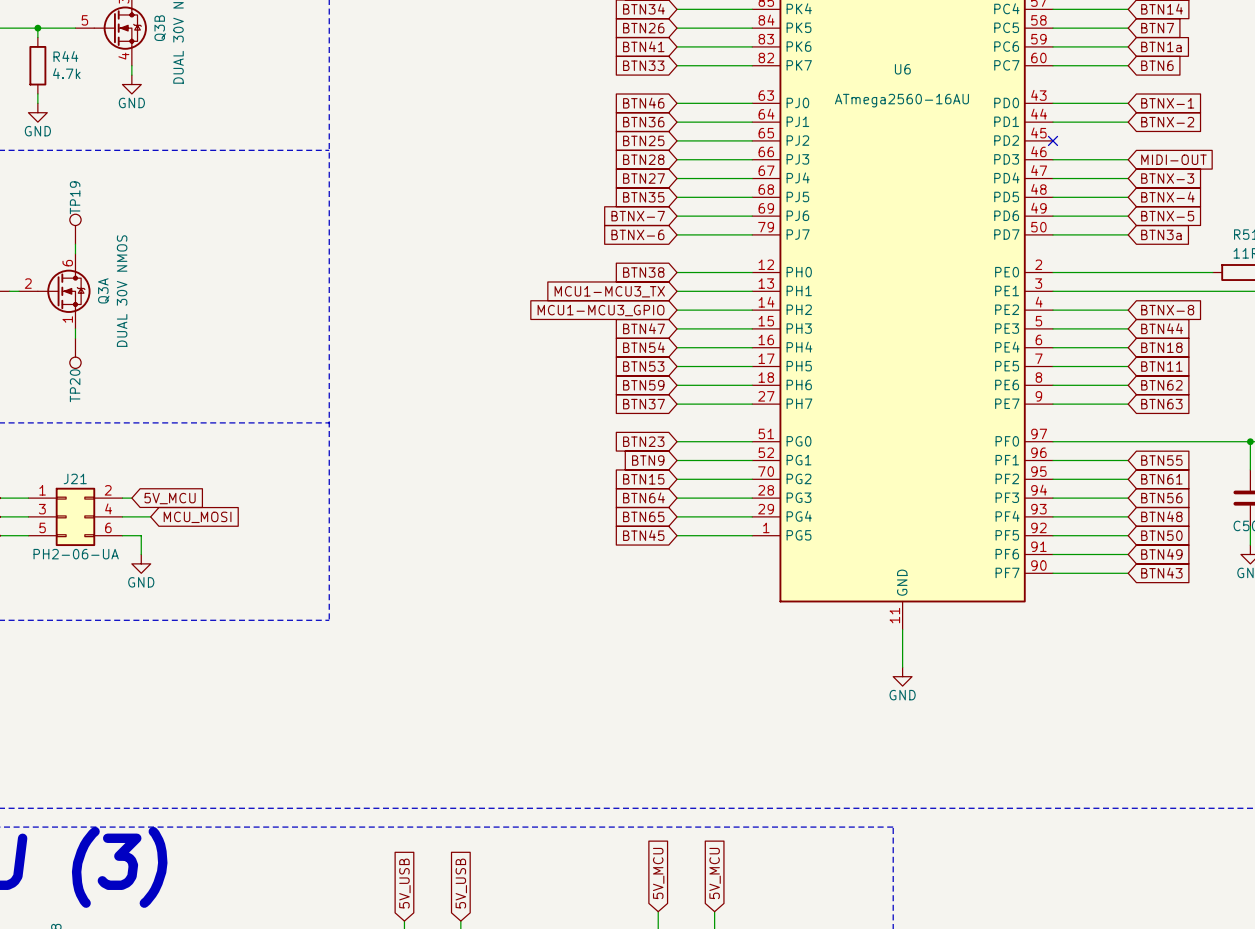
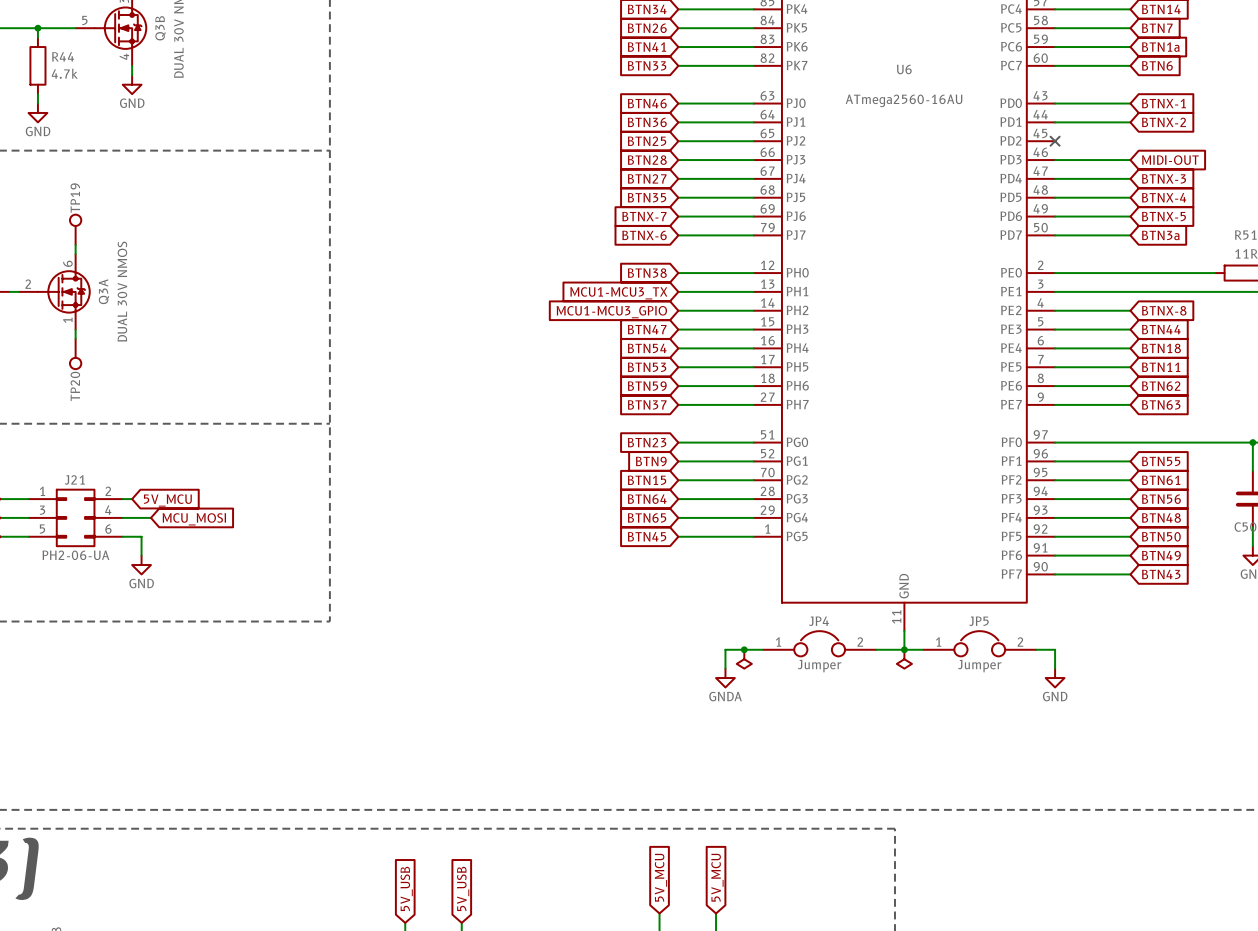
JP4: none -> Jumper (819, 643)
JP5: none -> Jumper (979, 643)
junction: none -> (744, 649)
wire: none -> (763, 649) (725, 649) (725, 668)
wire: none -> (876, 649) (923, 649)
junction: none -> (904, 649)
wire: none -> (1036, 649) (1055, 649) (1055, 668)
power symbol: none -> (744, 659)
power symbol: none -> (904, 659)
power symbol: none -> GNDA (725, 678)
power symbol position: GND (902, 676) -> GND (1055, 678)

